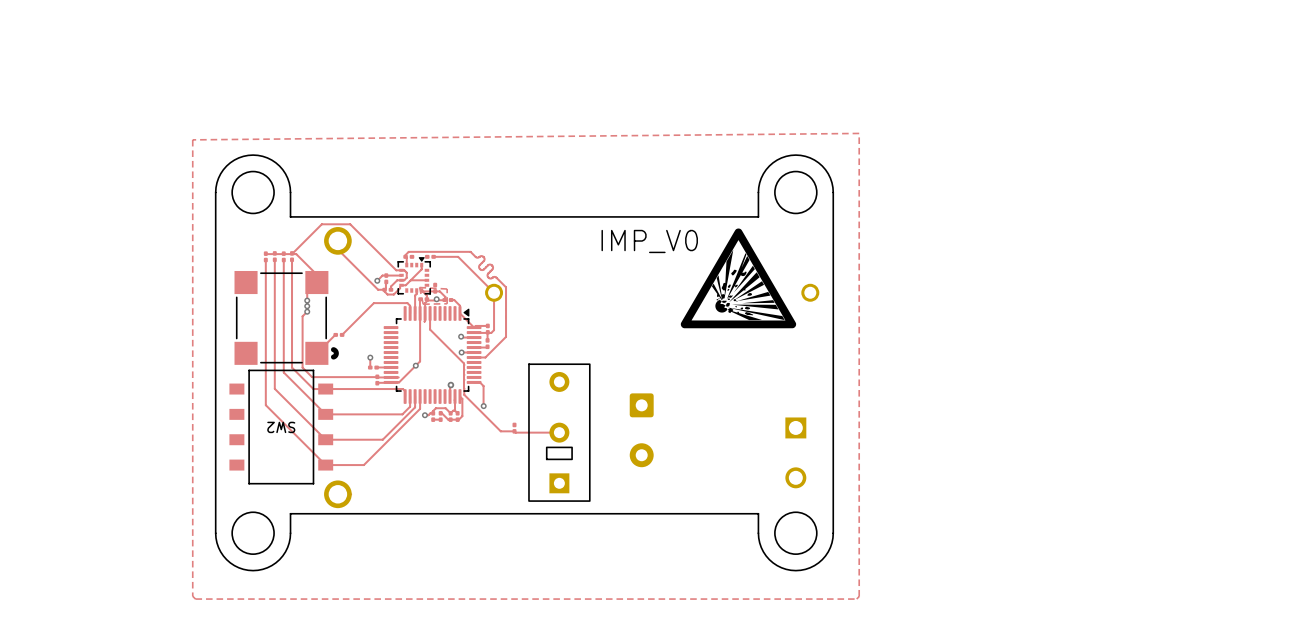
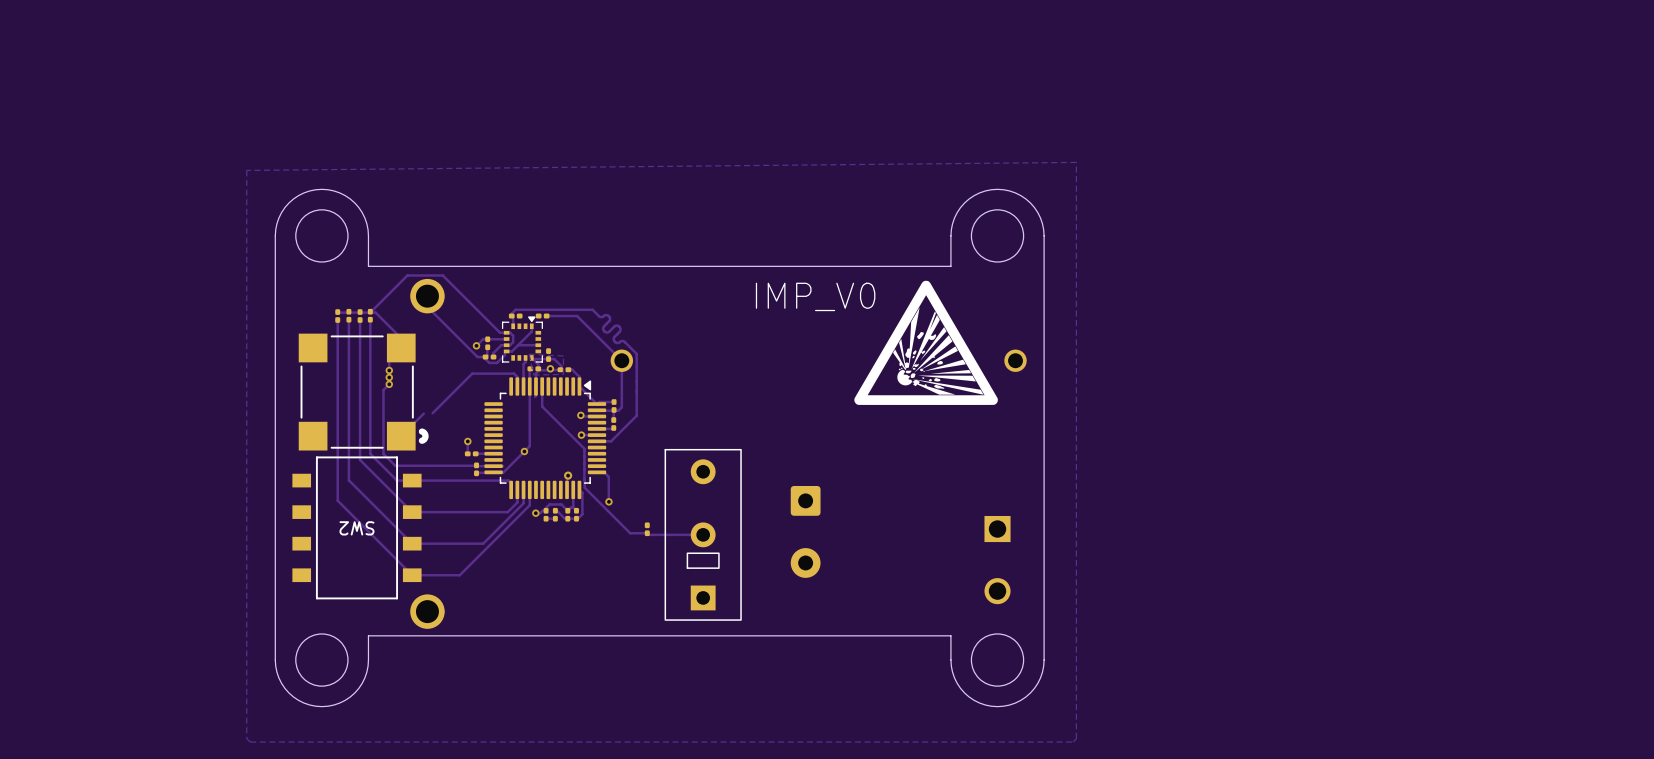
part: (338, 334) -> none

